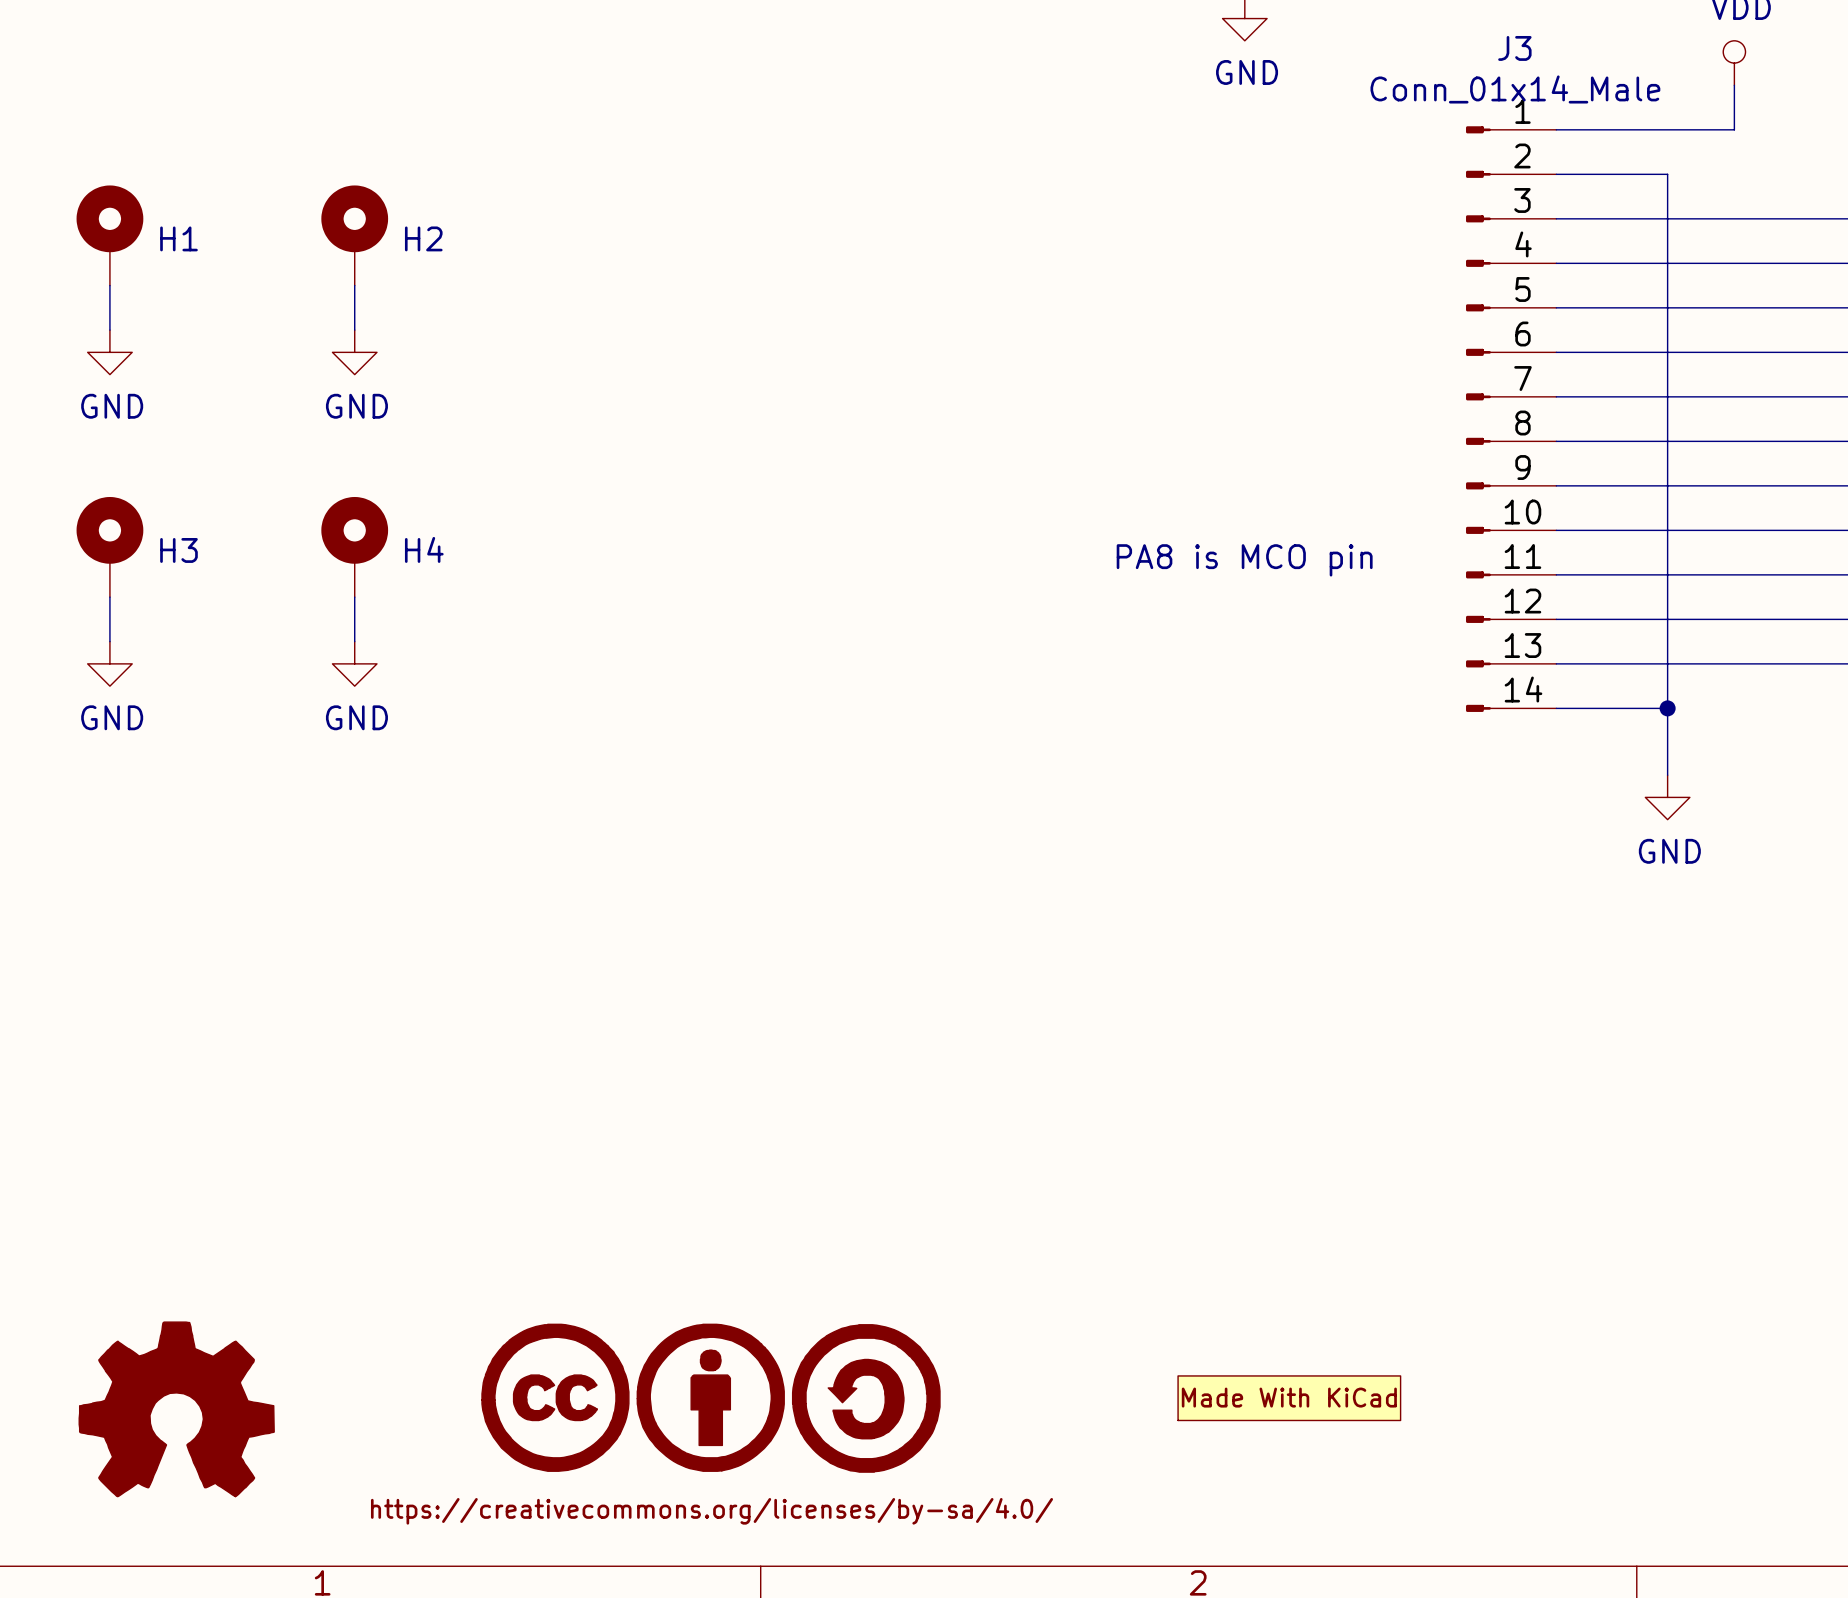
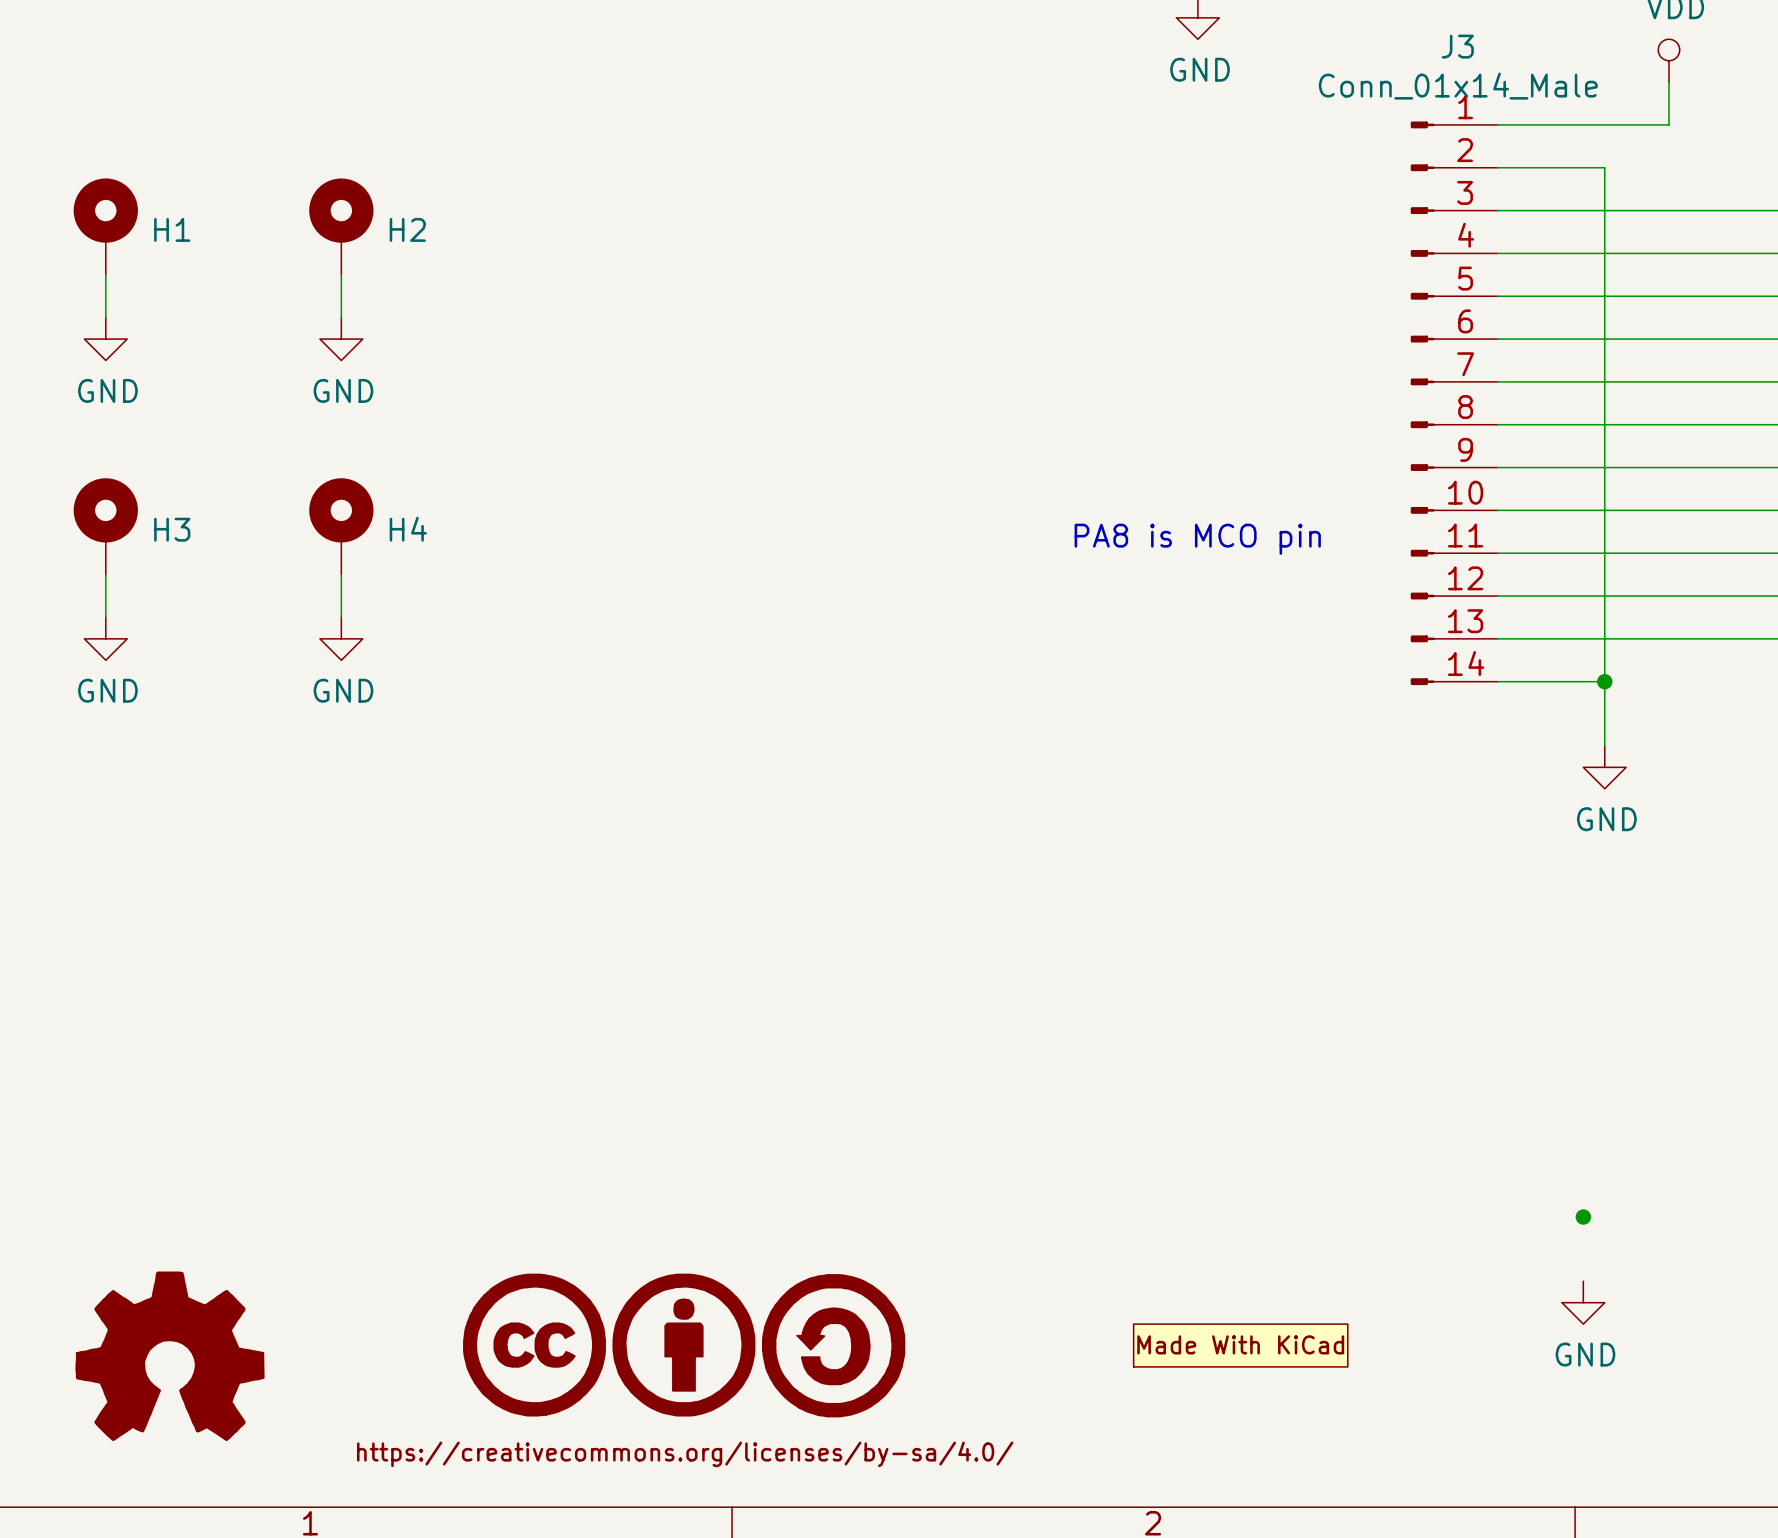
junction: none -> (1583, 1217)
power symbol: none -> GND (1583, 1302)

